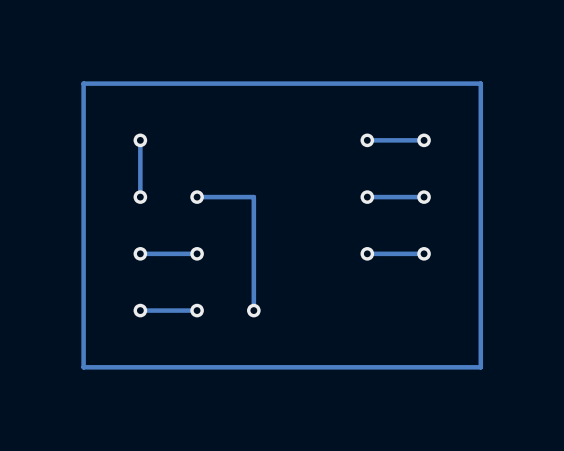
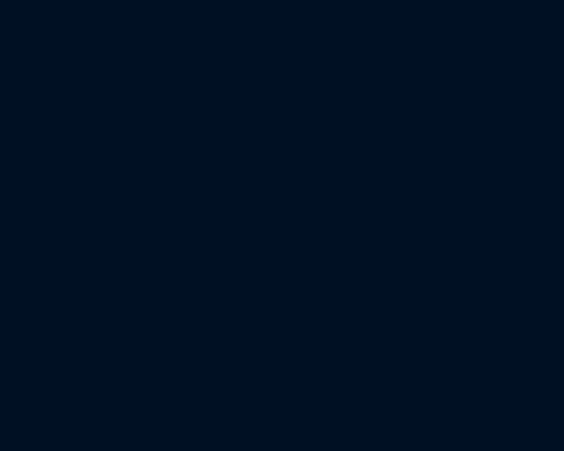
bottom track: (480, 83) (83, 83) (83, 367) (480, 367) (480, 83) -> none
bottom track: (140, 140) (140, 197) -> none
via: (140, 140) -> none
via: (367, 140) -> none
bottom track: (424, 140) (367, 140) -> none
via: (424, 140) -> none
via: (140, 197) -> none
bottom track: (197, 197) (253, 197) (253, 310) -> none
via: (197, 197) -> none
via: (367, 197) -> none
bottom track: (424, 197) (367, 197) -> none
via: (424, 197) -> none
via: (140, 253) -> none
bottom track: (197, 253) (140, 253) -> none
via: (197, 253) -> none
via: (367, 253) -> none
bottom track: (424, 253) (367, 253) -> none
via: (424, 253) -> none
via: (140, 310) -> none
bottom track: (197, 310) (140, 310) -> none
via: (197, 310) -> none
via: (253, 310) -> none

